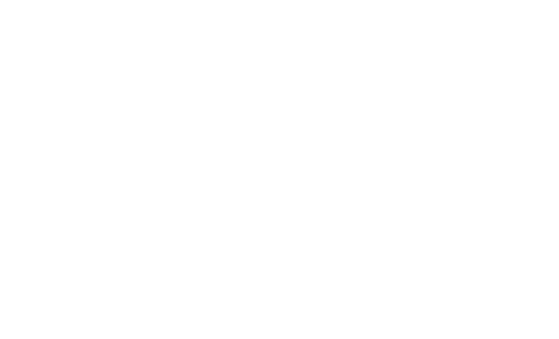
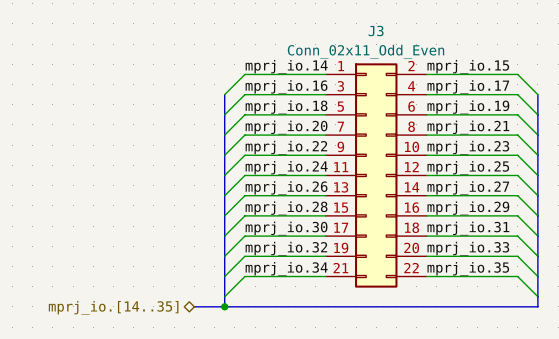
label: none -> mprj_io.14 (286, 66)
label: none -> mprj_io.15 (468, 66)
wire: none -> (325, 74) (244, 74) (224, 94)
wire: none -> (426, 74) (517, 74) (537, 94)
label: none -> mprj_io.16 (286, 87)
label: none -> mprj_io.17 (468, 87)
bus: none -> (224, 94) (224, 306)
wire: none -> (325, 94) (244, 94) (224, 114)
wire: none -> (426, 94) (517, 94) (537, 114)
bus: none -> (537, 94) (537, 306) (194, 306)
label: none -> mprj_io.18 (286, 107)
label: none -> mprj_io.19 (468, 107)
wire: none -> (325, 114) (244, 114) (224, 135)
wire: none -> (426, 114) (517, 114) (537, 135)
label: none -> mprj_io.20 (286, 127)
label: none -> mprj_io.21 (468, 127)
wire: none -> (325, 135) (244, 135) (224, 155)
wire: none -> (426, 135) (517, 135) (537, 155)
label: none -> mprj_io.22 (286, 147)
label: none -> mprj_io.23 (468, 147)
wire: none -> (325, 155) (244, 155) (224, 175)
wire: none -> (426, 155) (517, 155) (537, 175)
label: none -> mprj_io.24 (286, 167)
label: none -> mprj_io.25 (468, 167)
wire: none -> (325, 175) (244, 175) (224, 195)
J3: none -> Conn_02x11_Odd_Even (376, 175)
wire: none -> (426, 175) (517, 175) (537, 195)
label: none -> mprj_io.26 (286, 188)
label: none -> mprj_io.27 (468, 188)
wire: none -> (325, 195) (244, 195) (224, 215)
wire: none -> (426, 195) (517, 195) (537, 215)
label: none -> mprj_io.28 (286, 208)
label: none -> mprj_io.29 (468, 208)
wire: none -> (325, 215) (244, 215) (224, 236)
wire: none -> (426, 215) (517, 215) (537, 236)
label: none -> mprj_io.30 (286, 228)
label: none -> mprj_io.31 (468, 228)
wire: none -> (325, 236) (244, 236) (224, 256)
wire: none -> (426, 236) (517, 236) (537, 256)
label: none -> mprj_io.32 (286, 248)
label: none -> mprj_io.33 (468, 248)
wire: none -> (325, 256) (244, 256) (224, 276)
wire: none -> (426, 256) (517, 256) (537, 276)
label: none -> mprj_io.34 (286, 268)
label: none -> mprj_io.35 (468, 268)
wire: none -> (325, 276) (244, 276) (224, 296)
wire: none -> (426, 276) (517, 276) (537, 296)
junction: none -> (224, 306)
hierarchical label: none -> mprj_io.[14..35] (113, 307)

